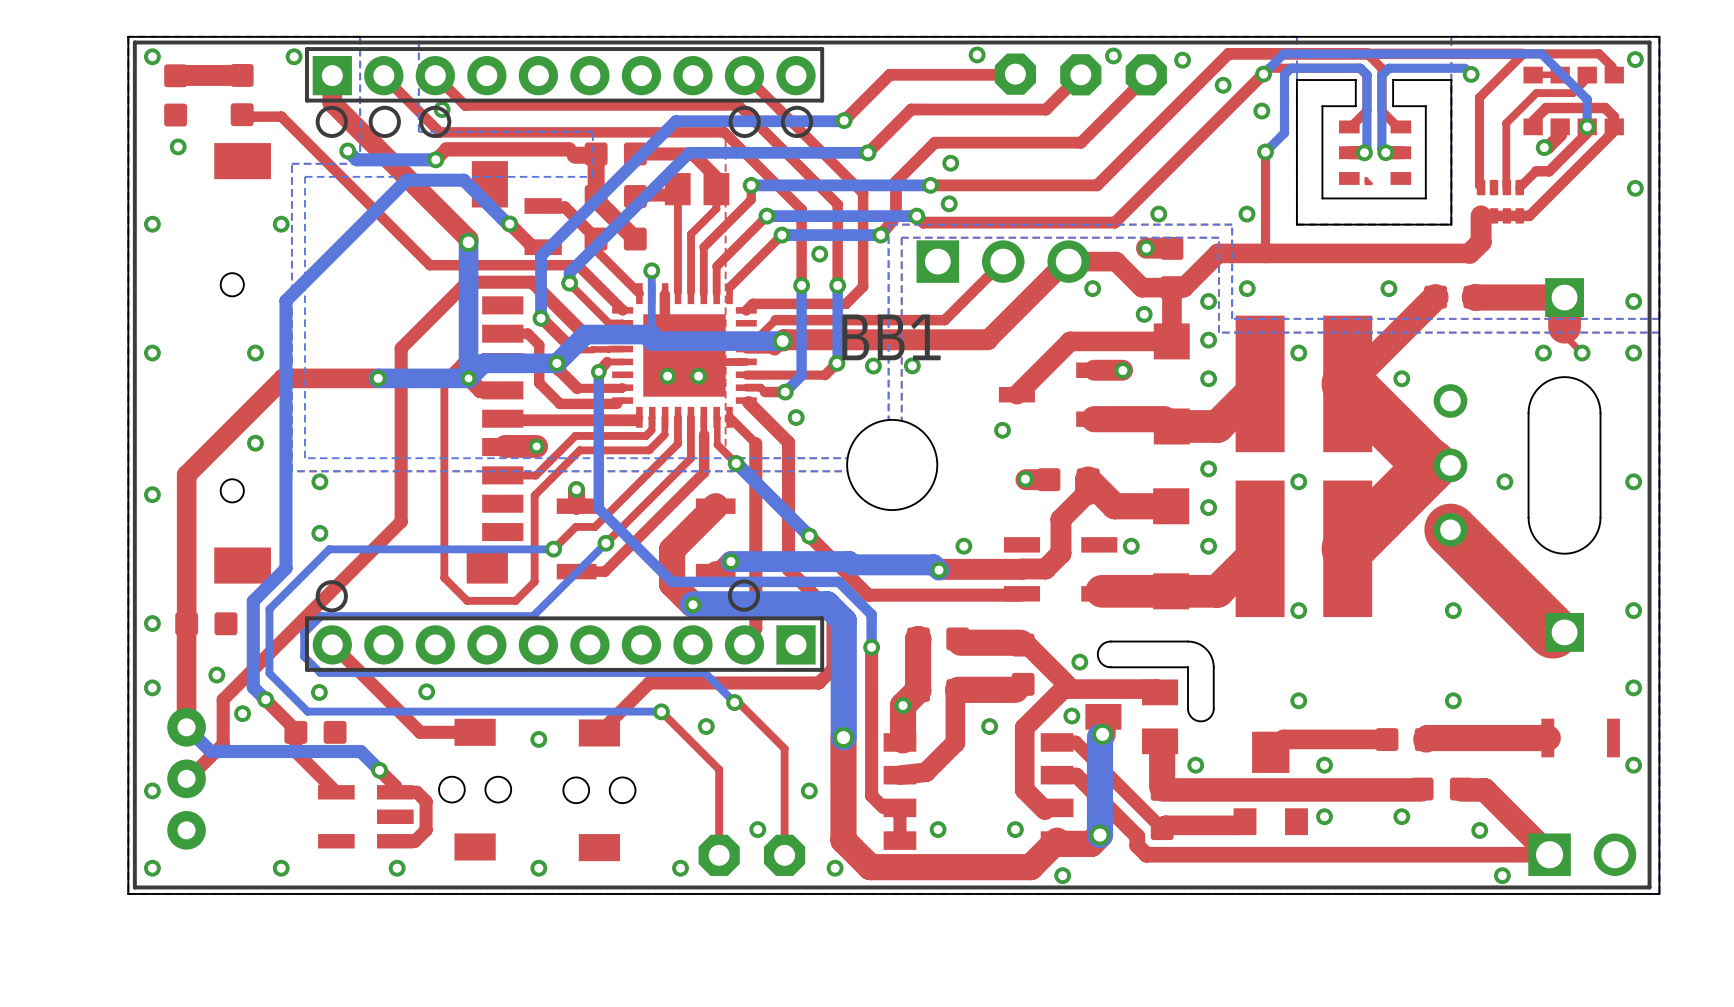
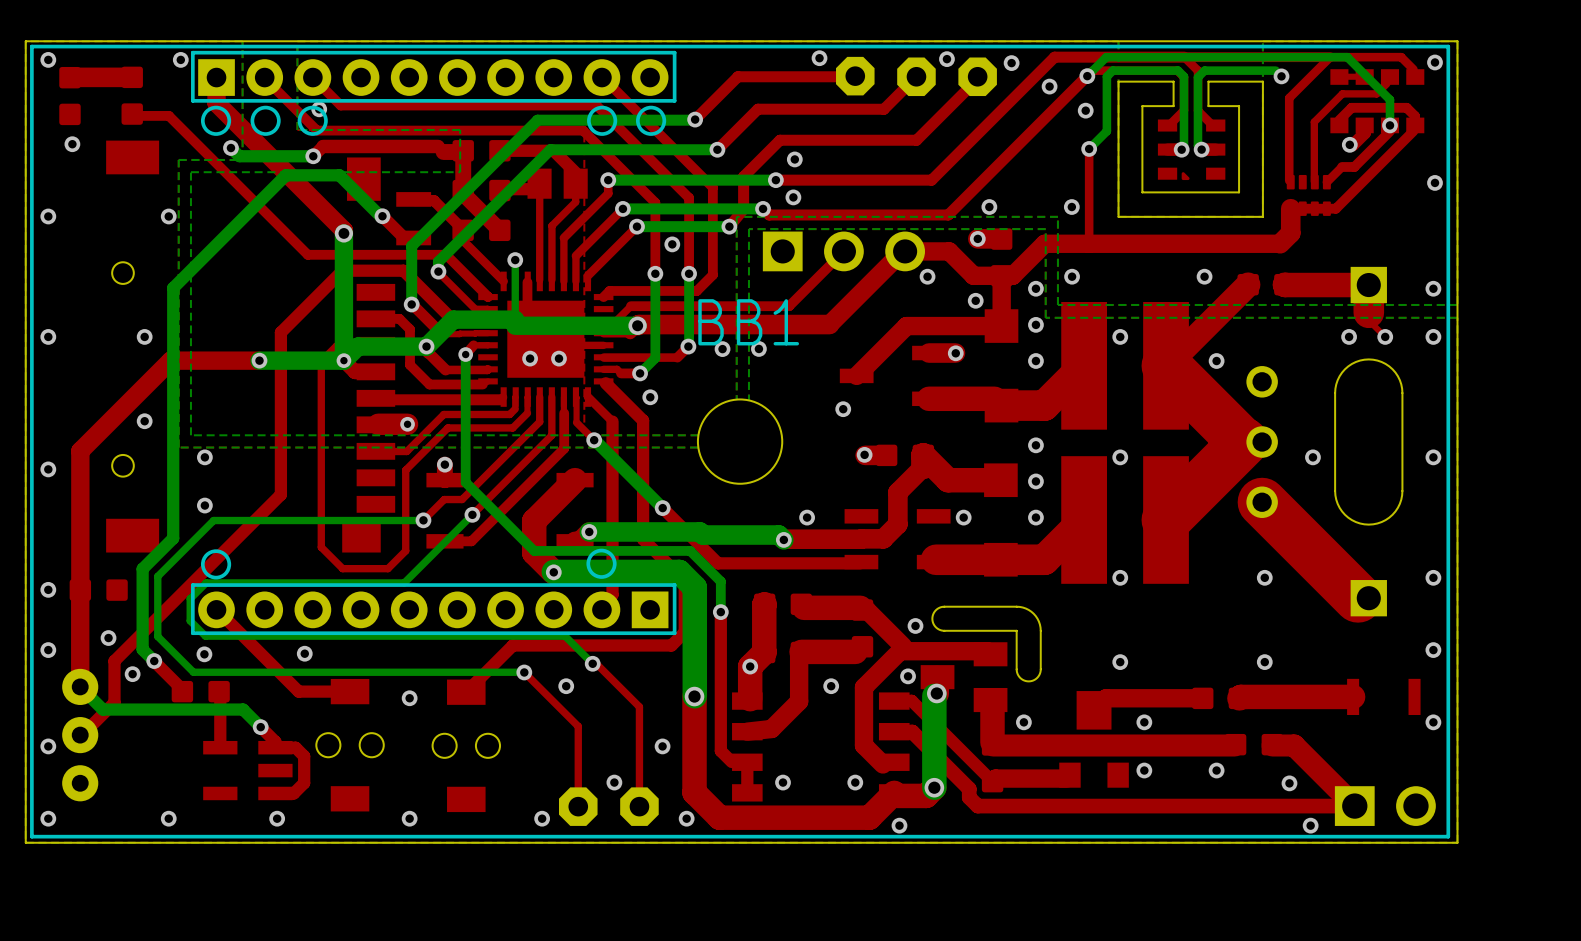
top track: (295, 732) (295, 751) (336, 792) -> (219, 691) (220, 747)

